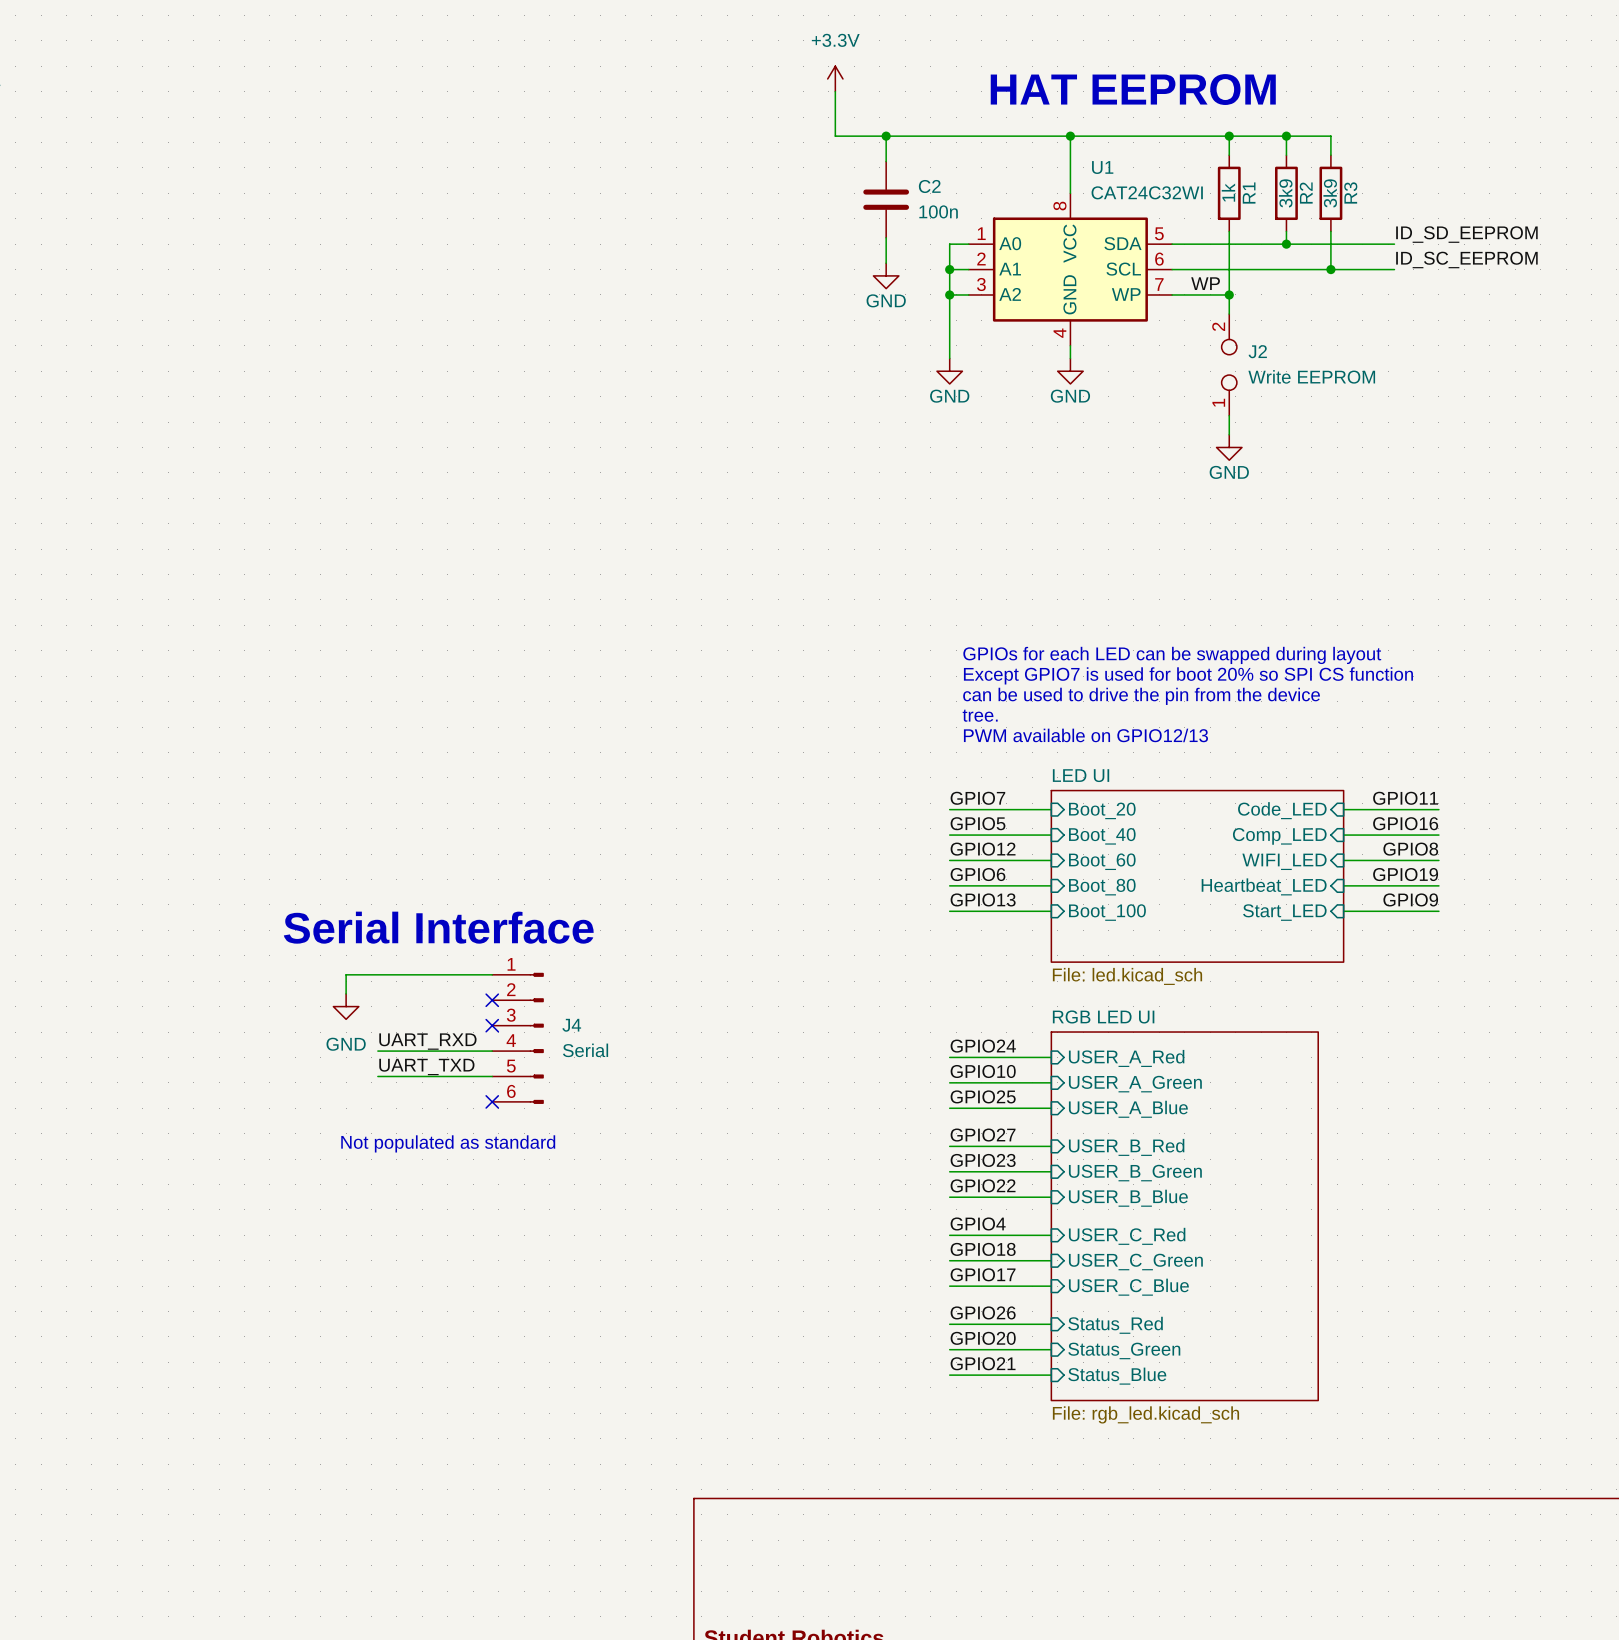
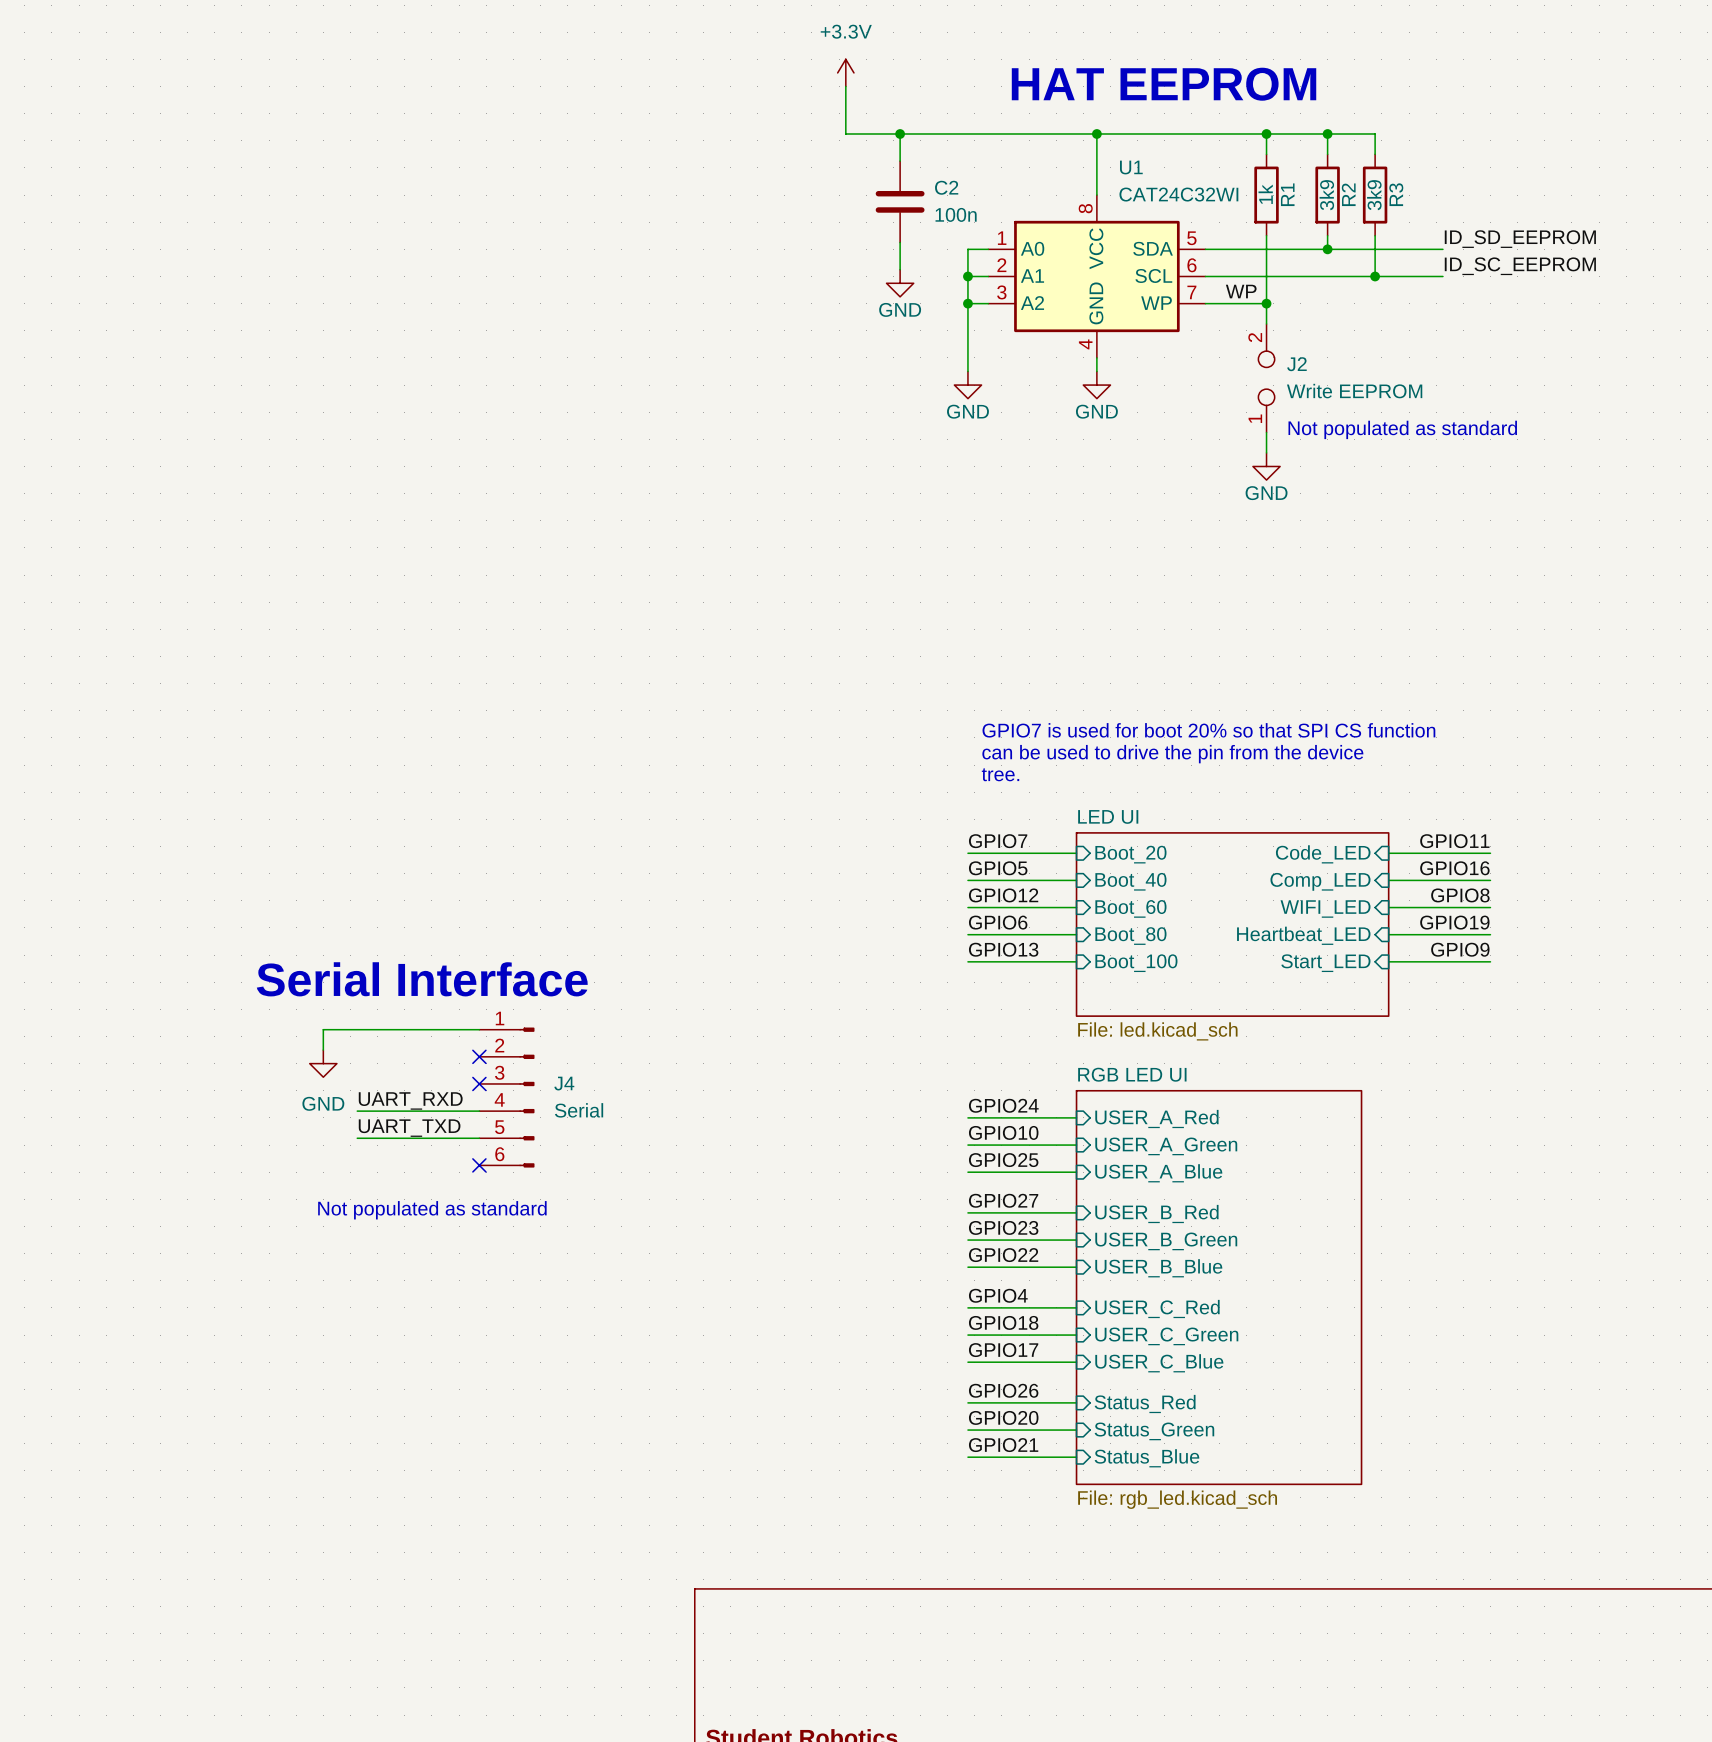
text: none -> Not populated as standard (1402, 429)
text: GPIOs for each LED can be swapped during layout (1172, 655) -> none
text: Except GPIO7 is used for boot 20% so SPI CS function (1188, 675) -> none
text: can be used to drive the pin from the device (1141, 696) -> GPIO7 is used for boot 20% so that SPI CS function (1208, 730)
text: tree. (980, 715) -> can be used to drive the pin from the device (1172, 754)
text: PWM available on GPIO12/13 (1085, 735) -> tree. (1000, 774)

